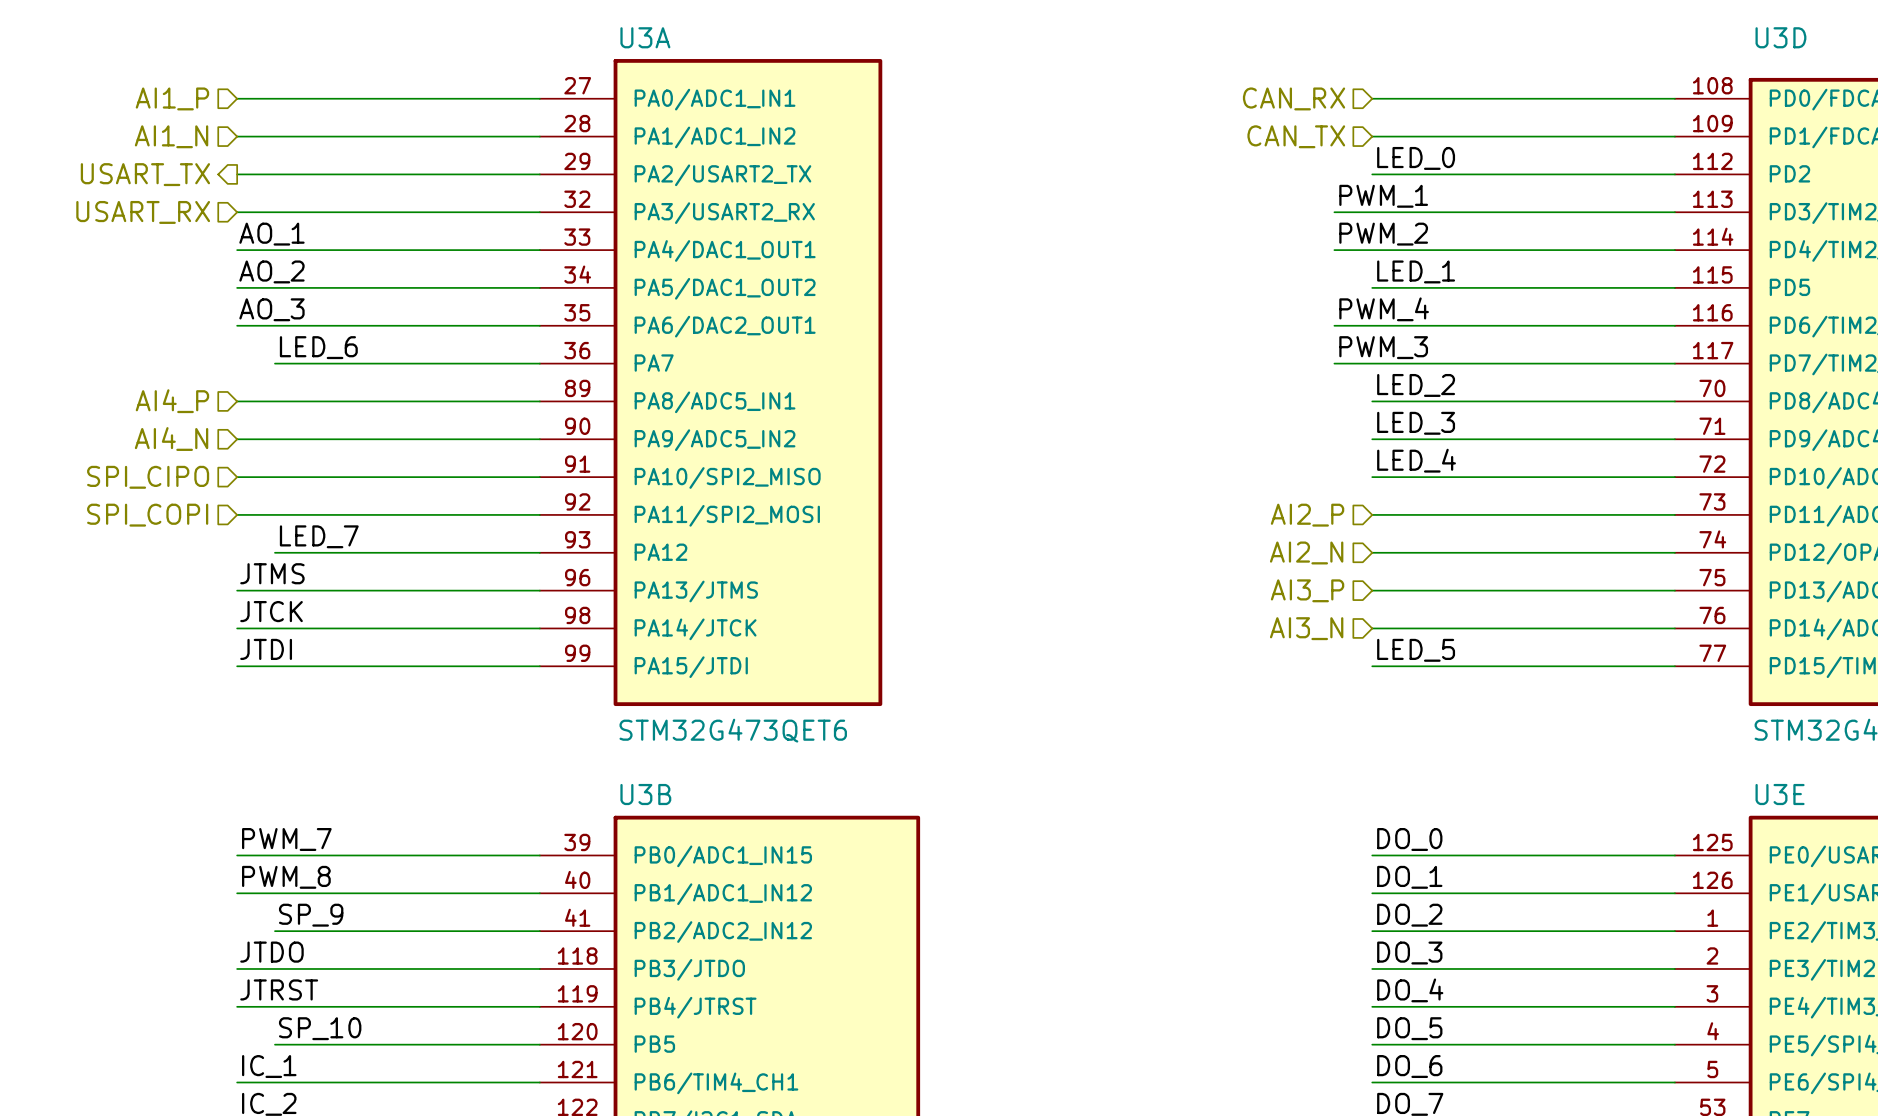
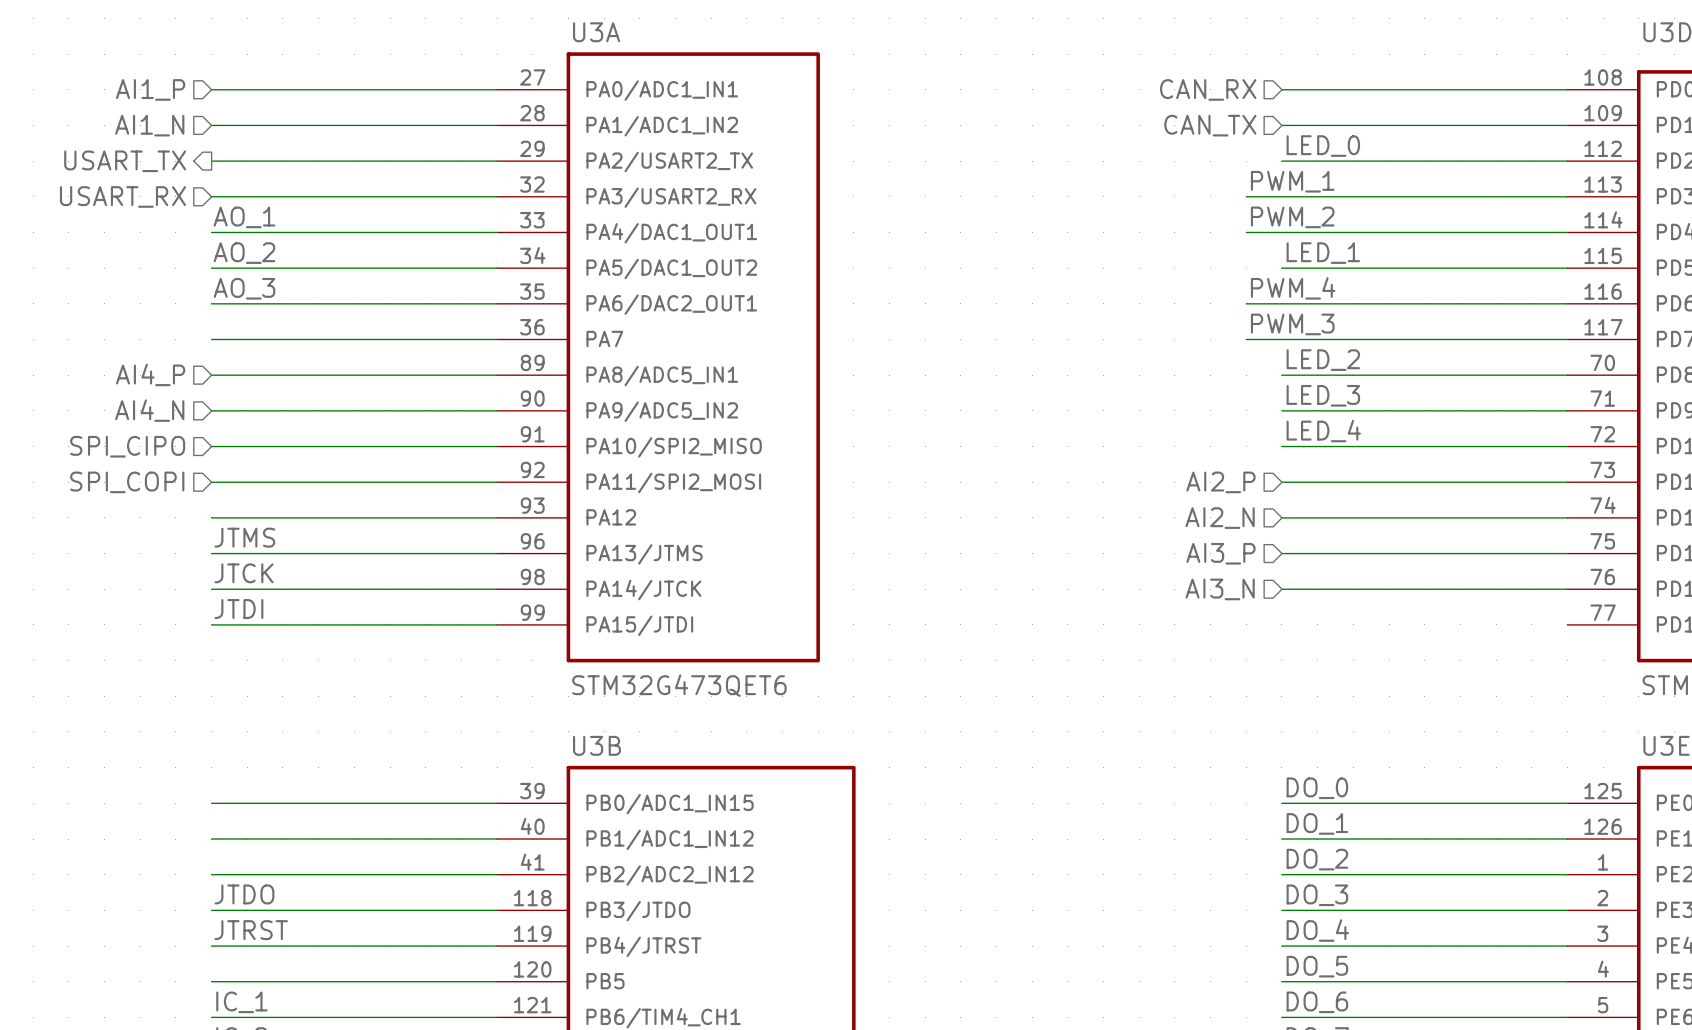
label: LED_6 (318, 347) -> none
wire: none -> (211, 339) (247, 339)
label: LED_7 (319, 536) -> none
wire: none -> (211, 517) (247, 517)
label: LED_5 (1416, 650) -> none
wire: (1372, 666) (1674, 666) -> none
label: PWM_7 (286, 839) -> none
label: PWM_8 (286, 877) -> none
label: SP_9 (311, 915) -> none
wire: none -> (211, 874) (247, 874)
label: SP_10 (320, 1028) -> none
wire: none -> (211, 981) (247, 981)

